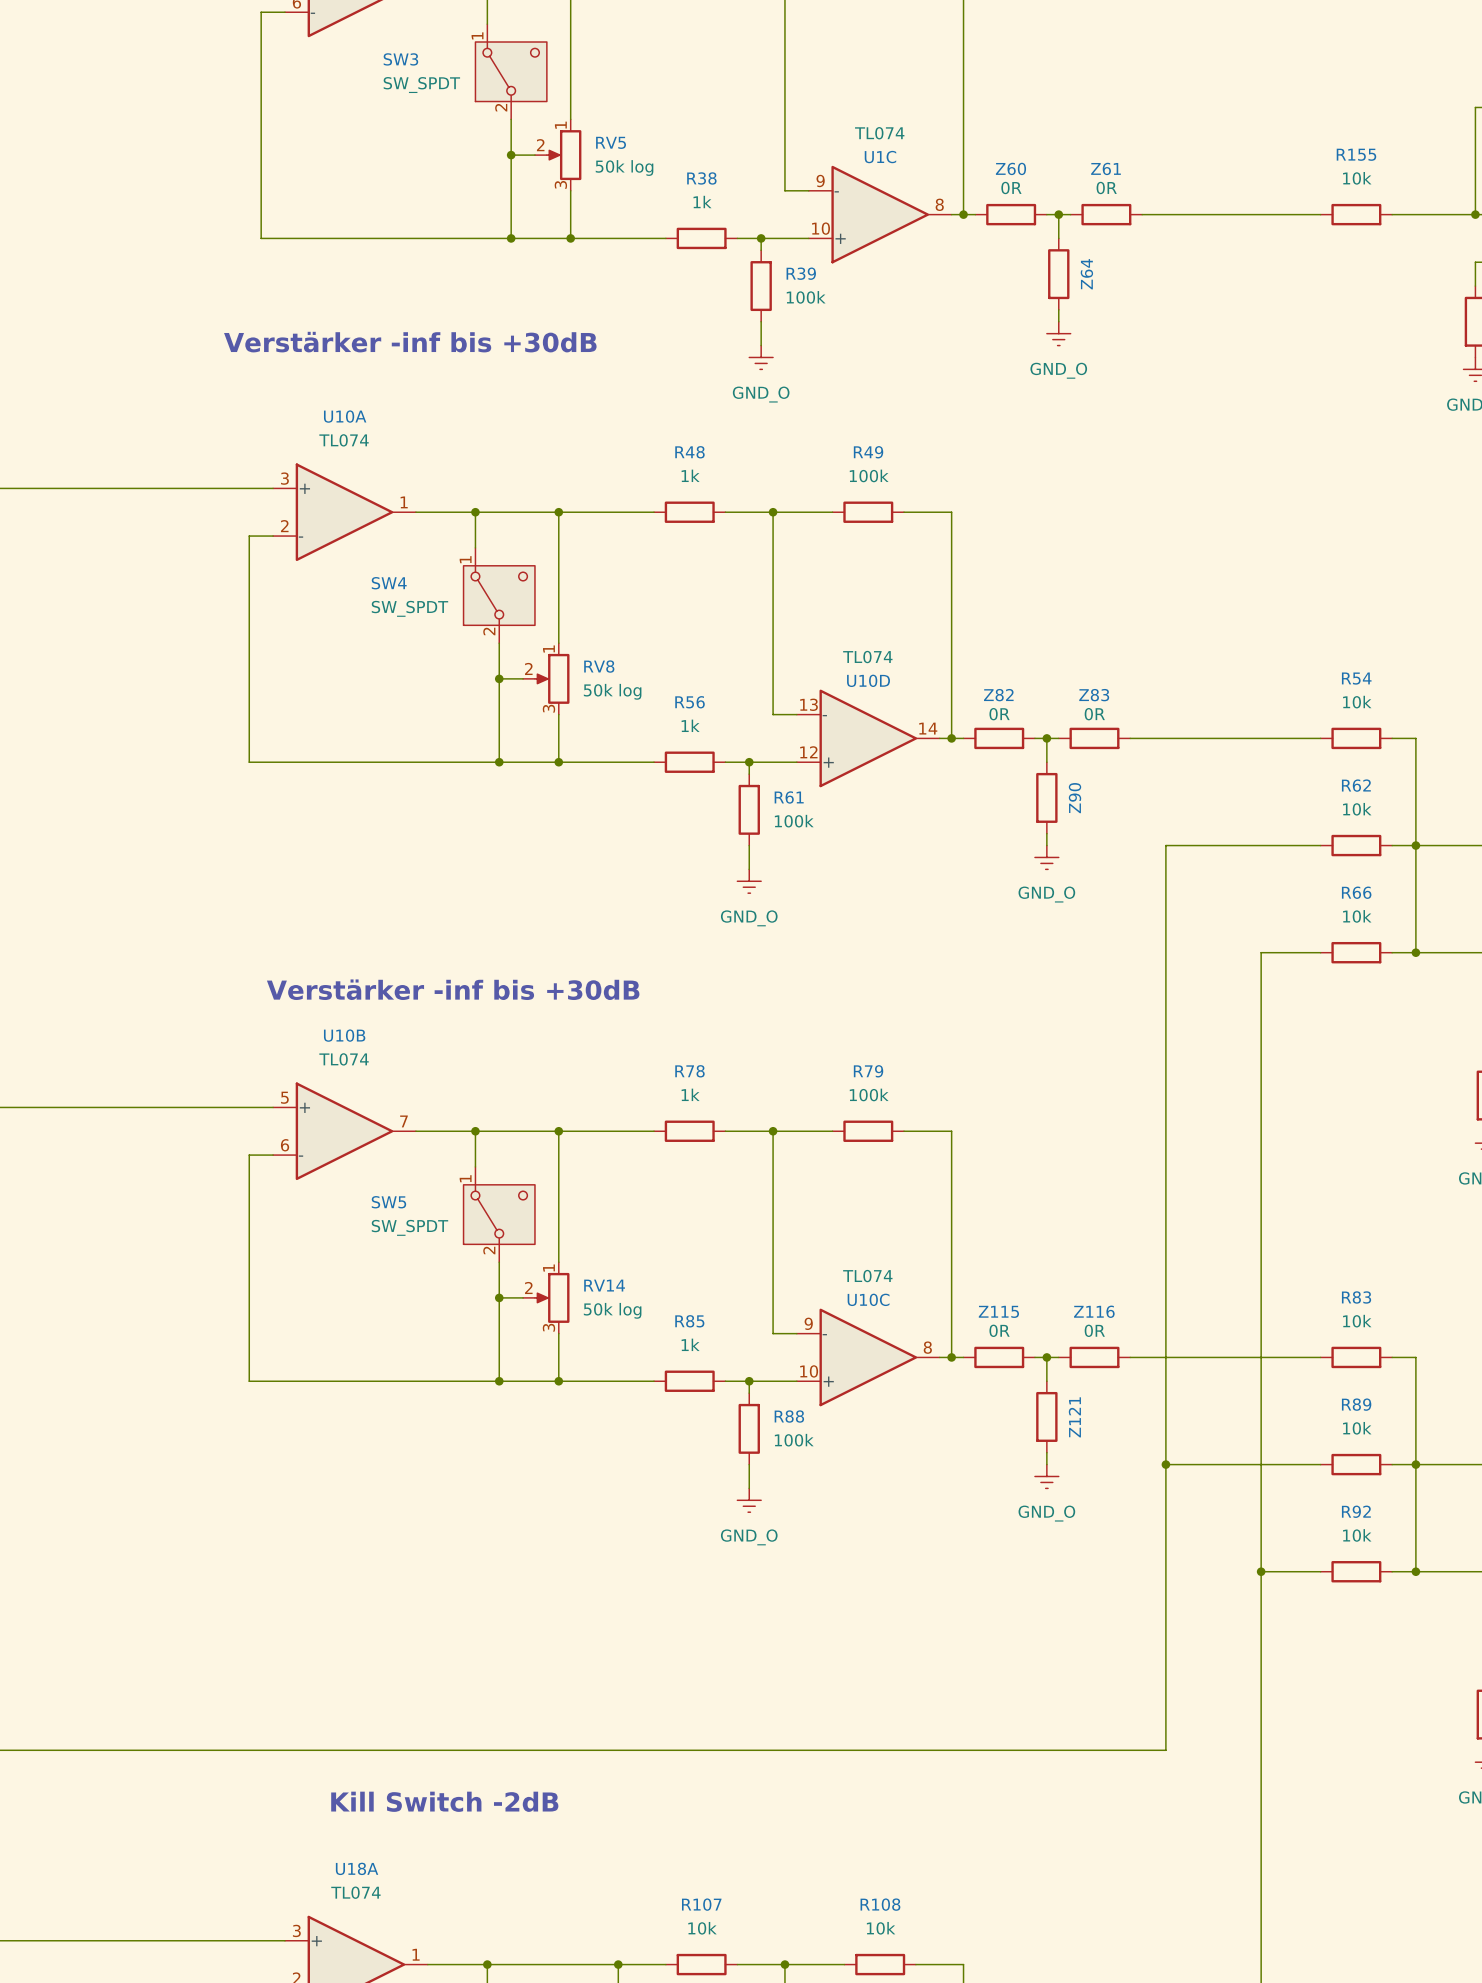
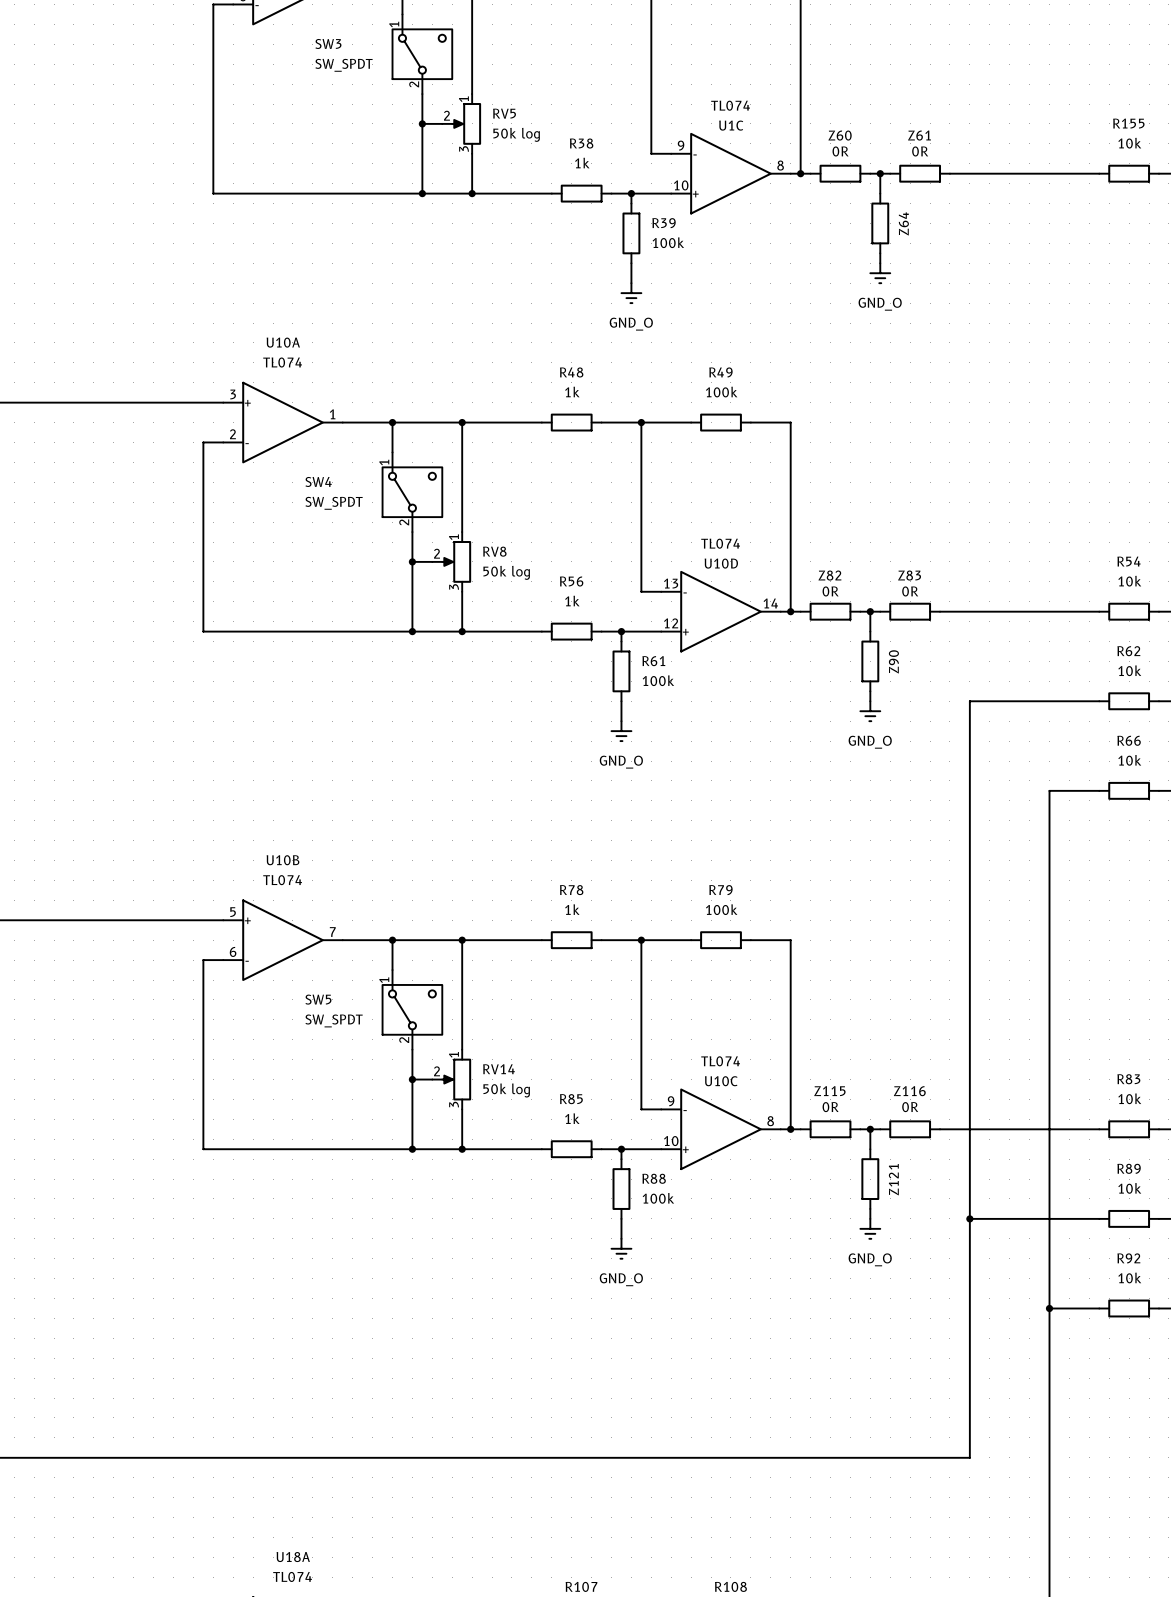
text: Verstärker -inf bis +30dB (410, 342) -> none
text: Verstärker -inf bis +30dB (453, 989) -> none
text: Kill Switch -2dB (444, 1801) -> none

